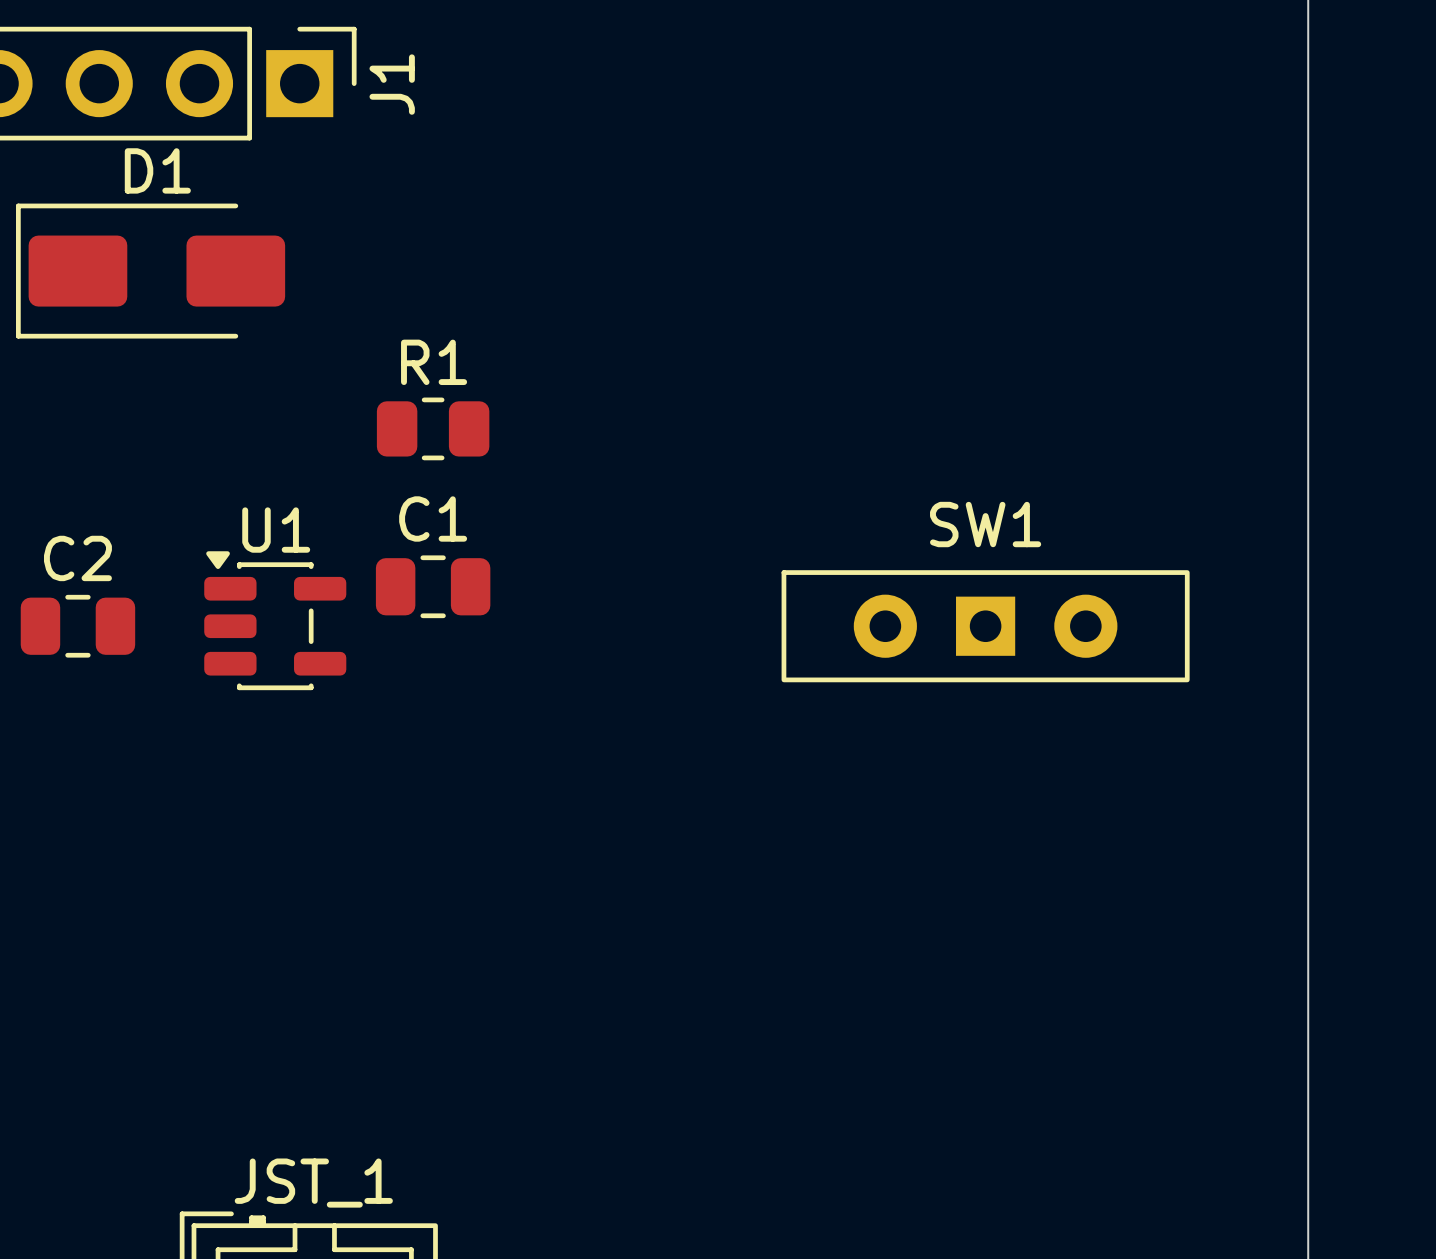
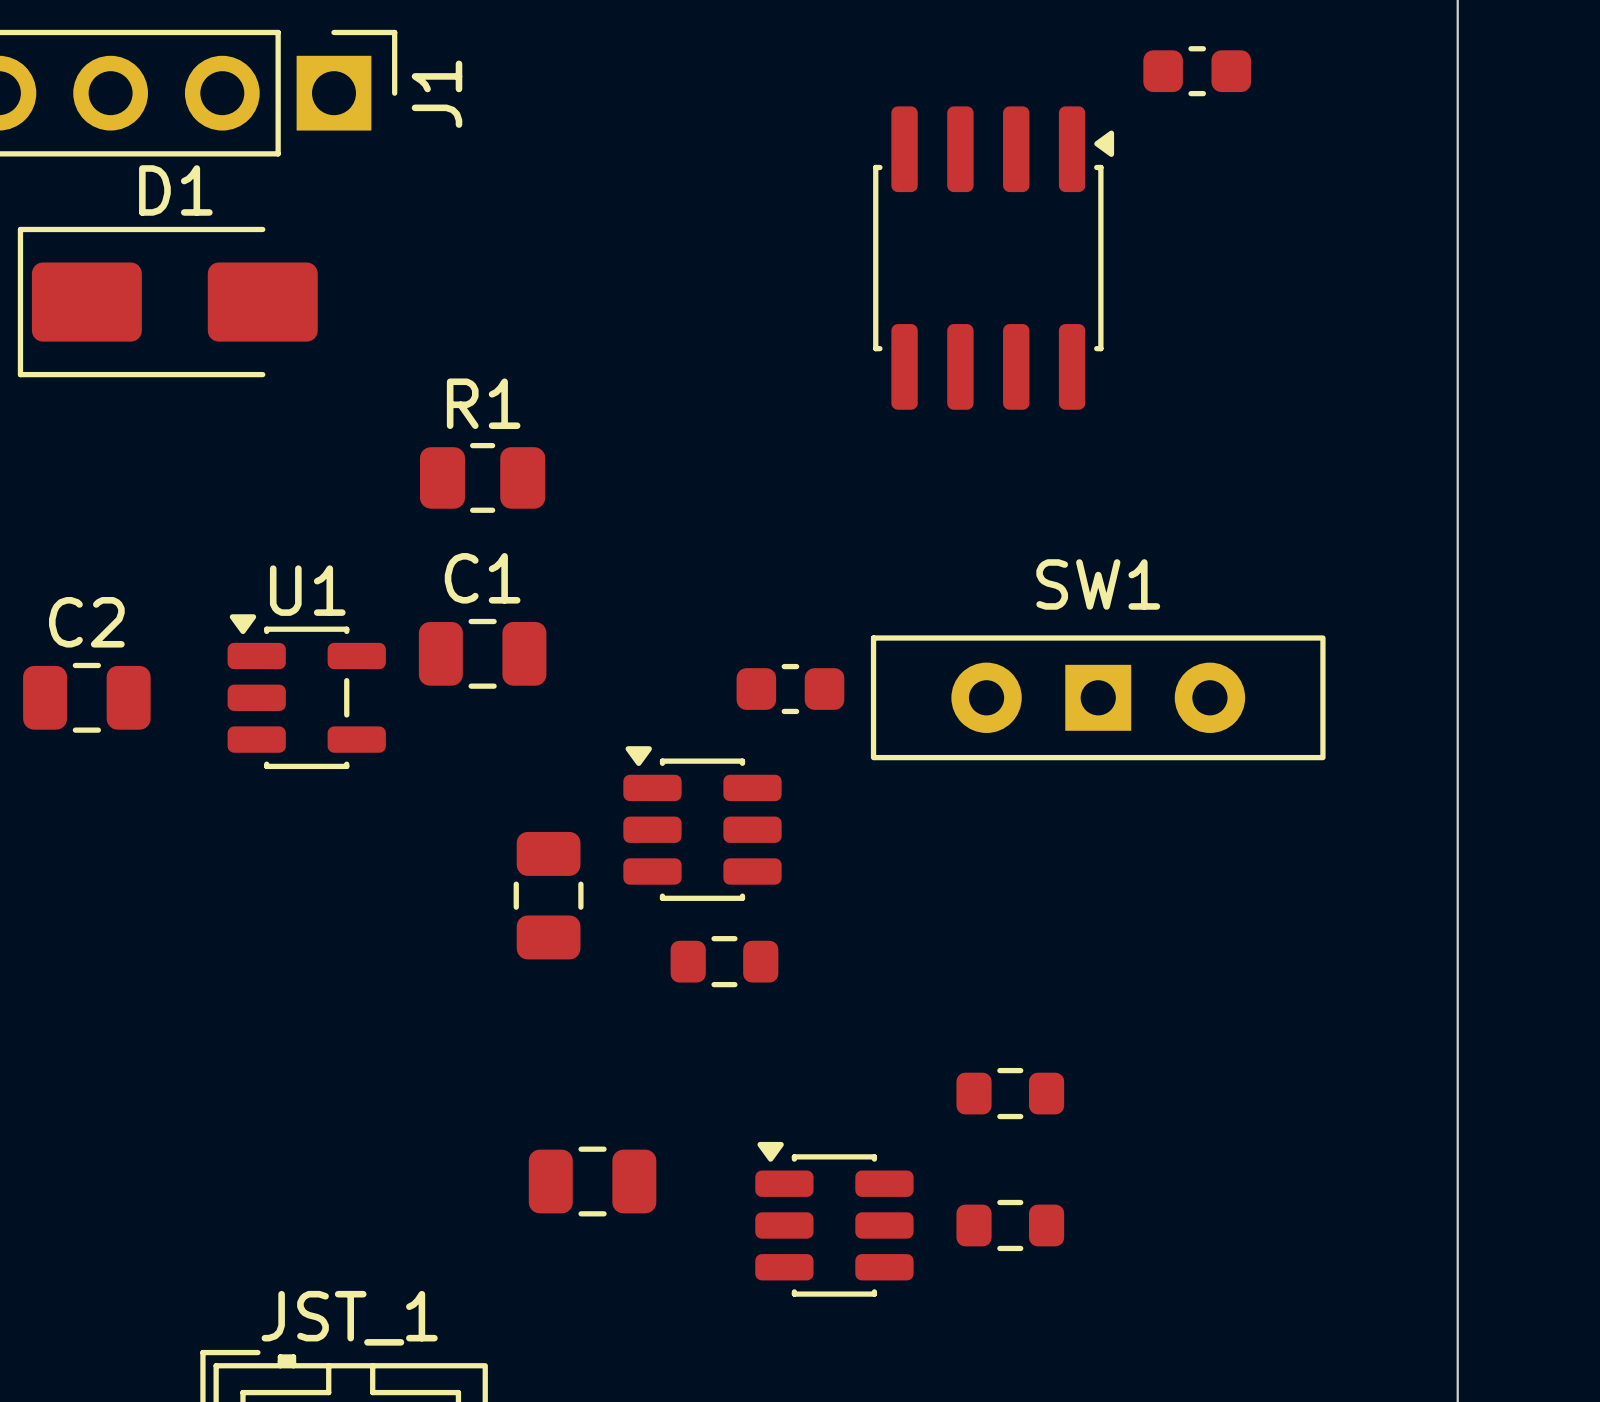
part: none -> (1197, 71)
part: none -> (993, 258)
part: none -> (790, 689)
part: none -> (702, 823)
part: none -> (548, 895)
part: none -> (724, 961)
part: none -> (1010, 1093)
part: none -> (592, 1181)
part: none -> (834, 1219)
part: none -> (1010, 1225)

